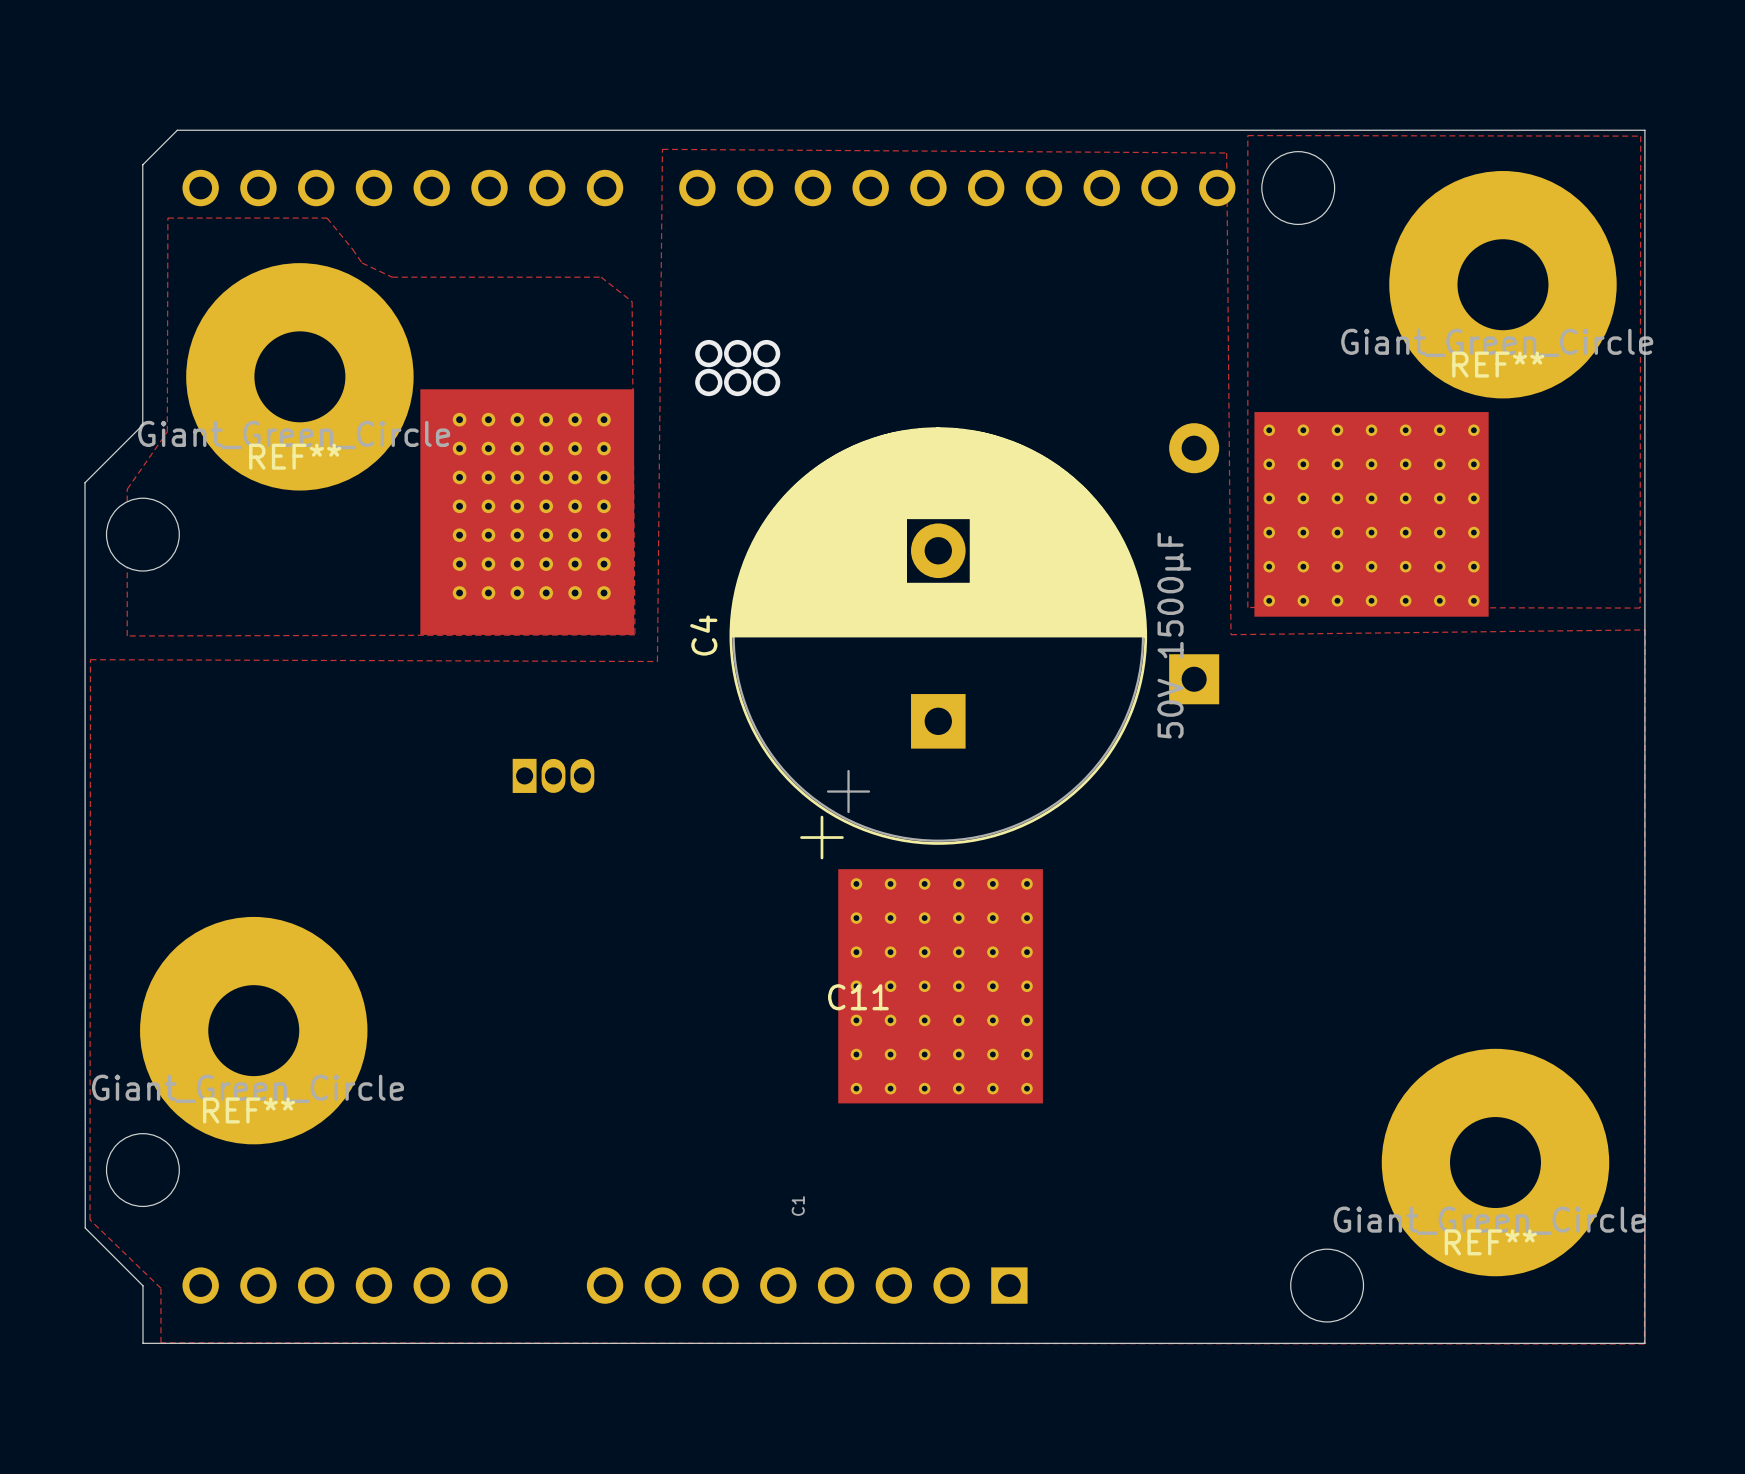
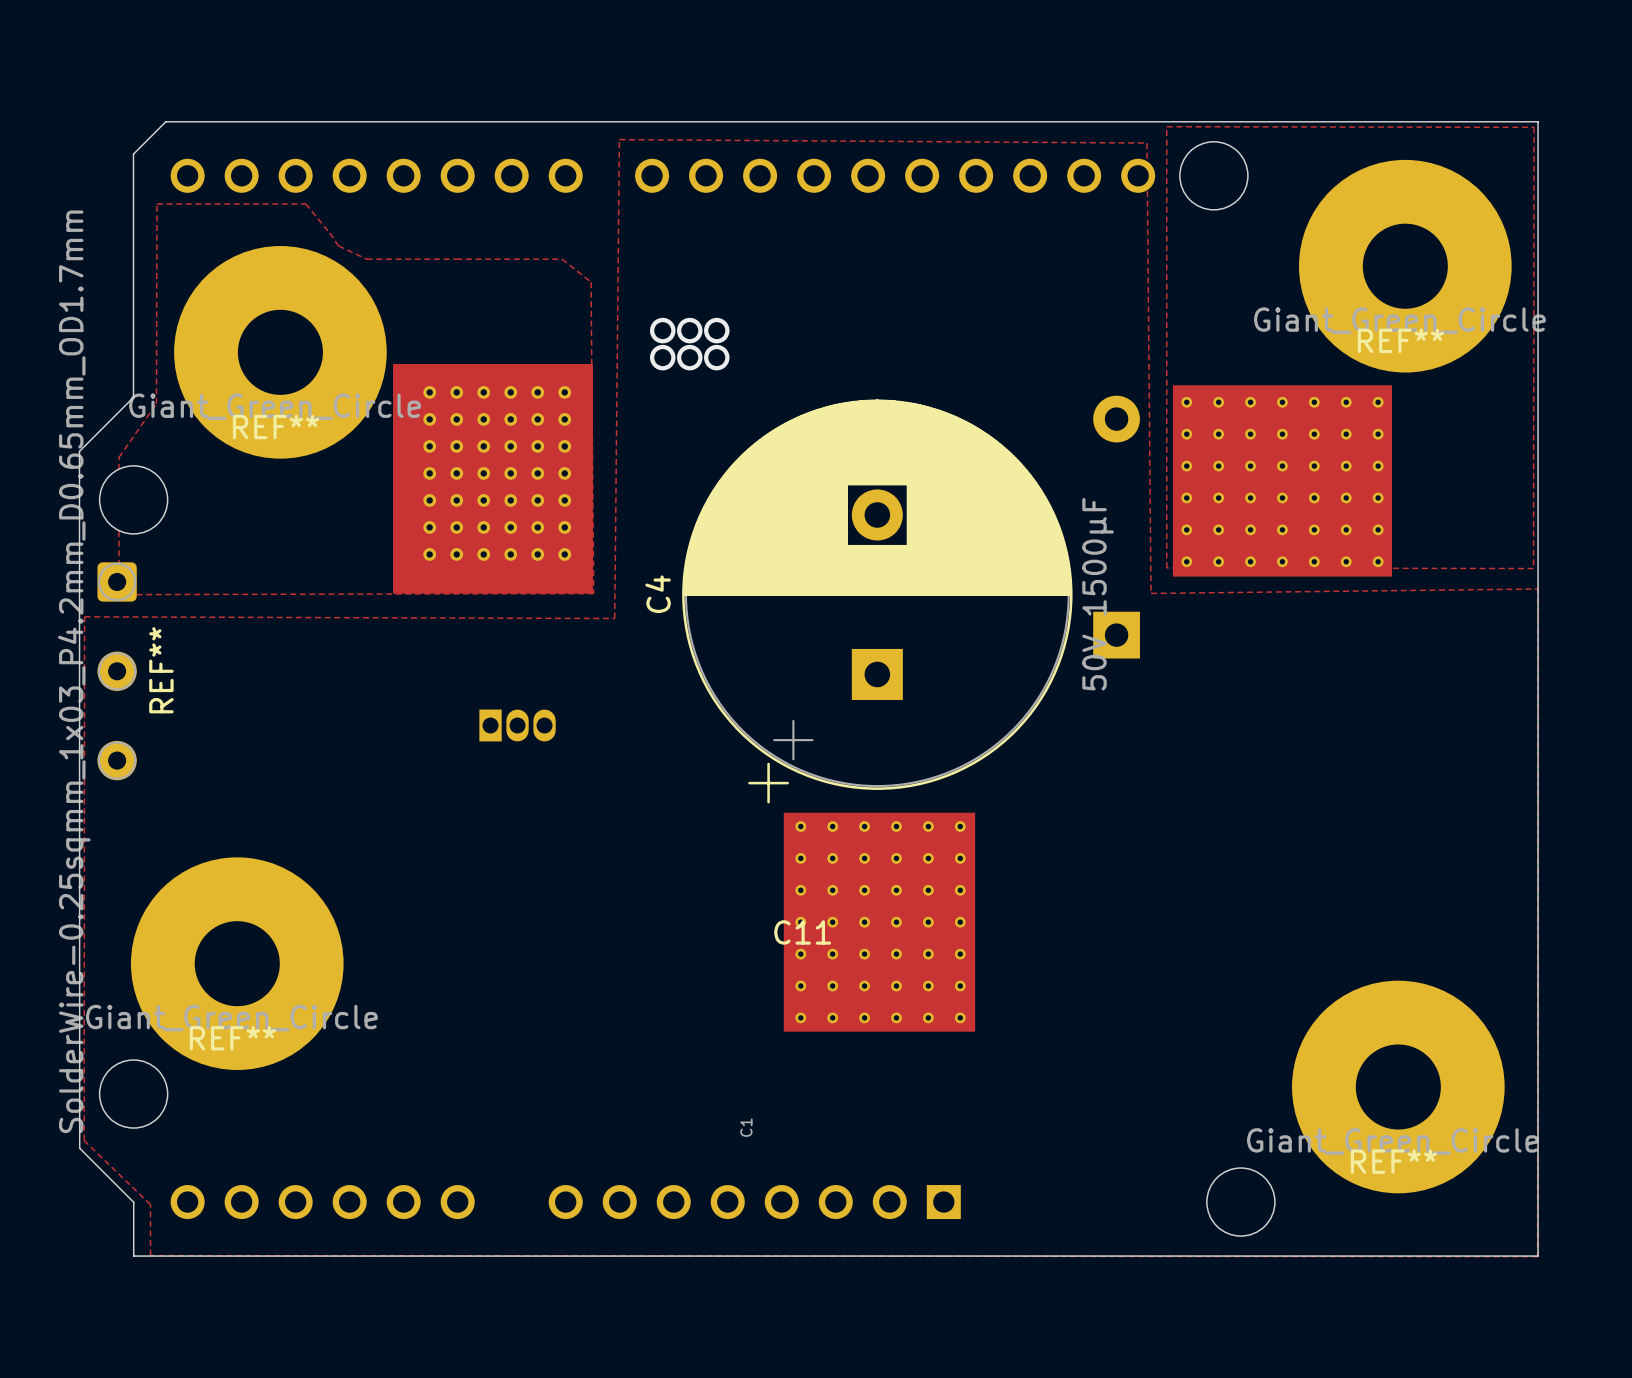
REF**: none -> SolderWire-0.25sqmm_1x03_P4.2mm_D0.65mm_OD1.7mm (117, 671)

